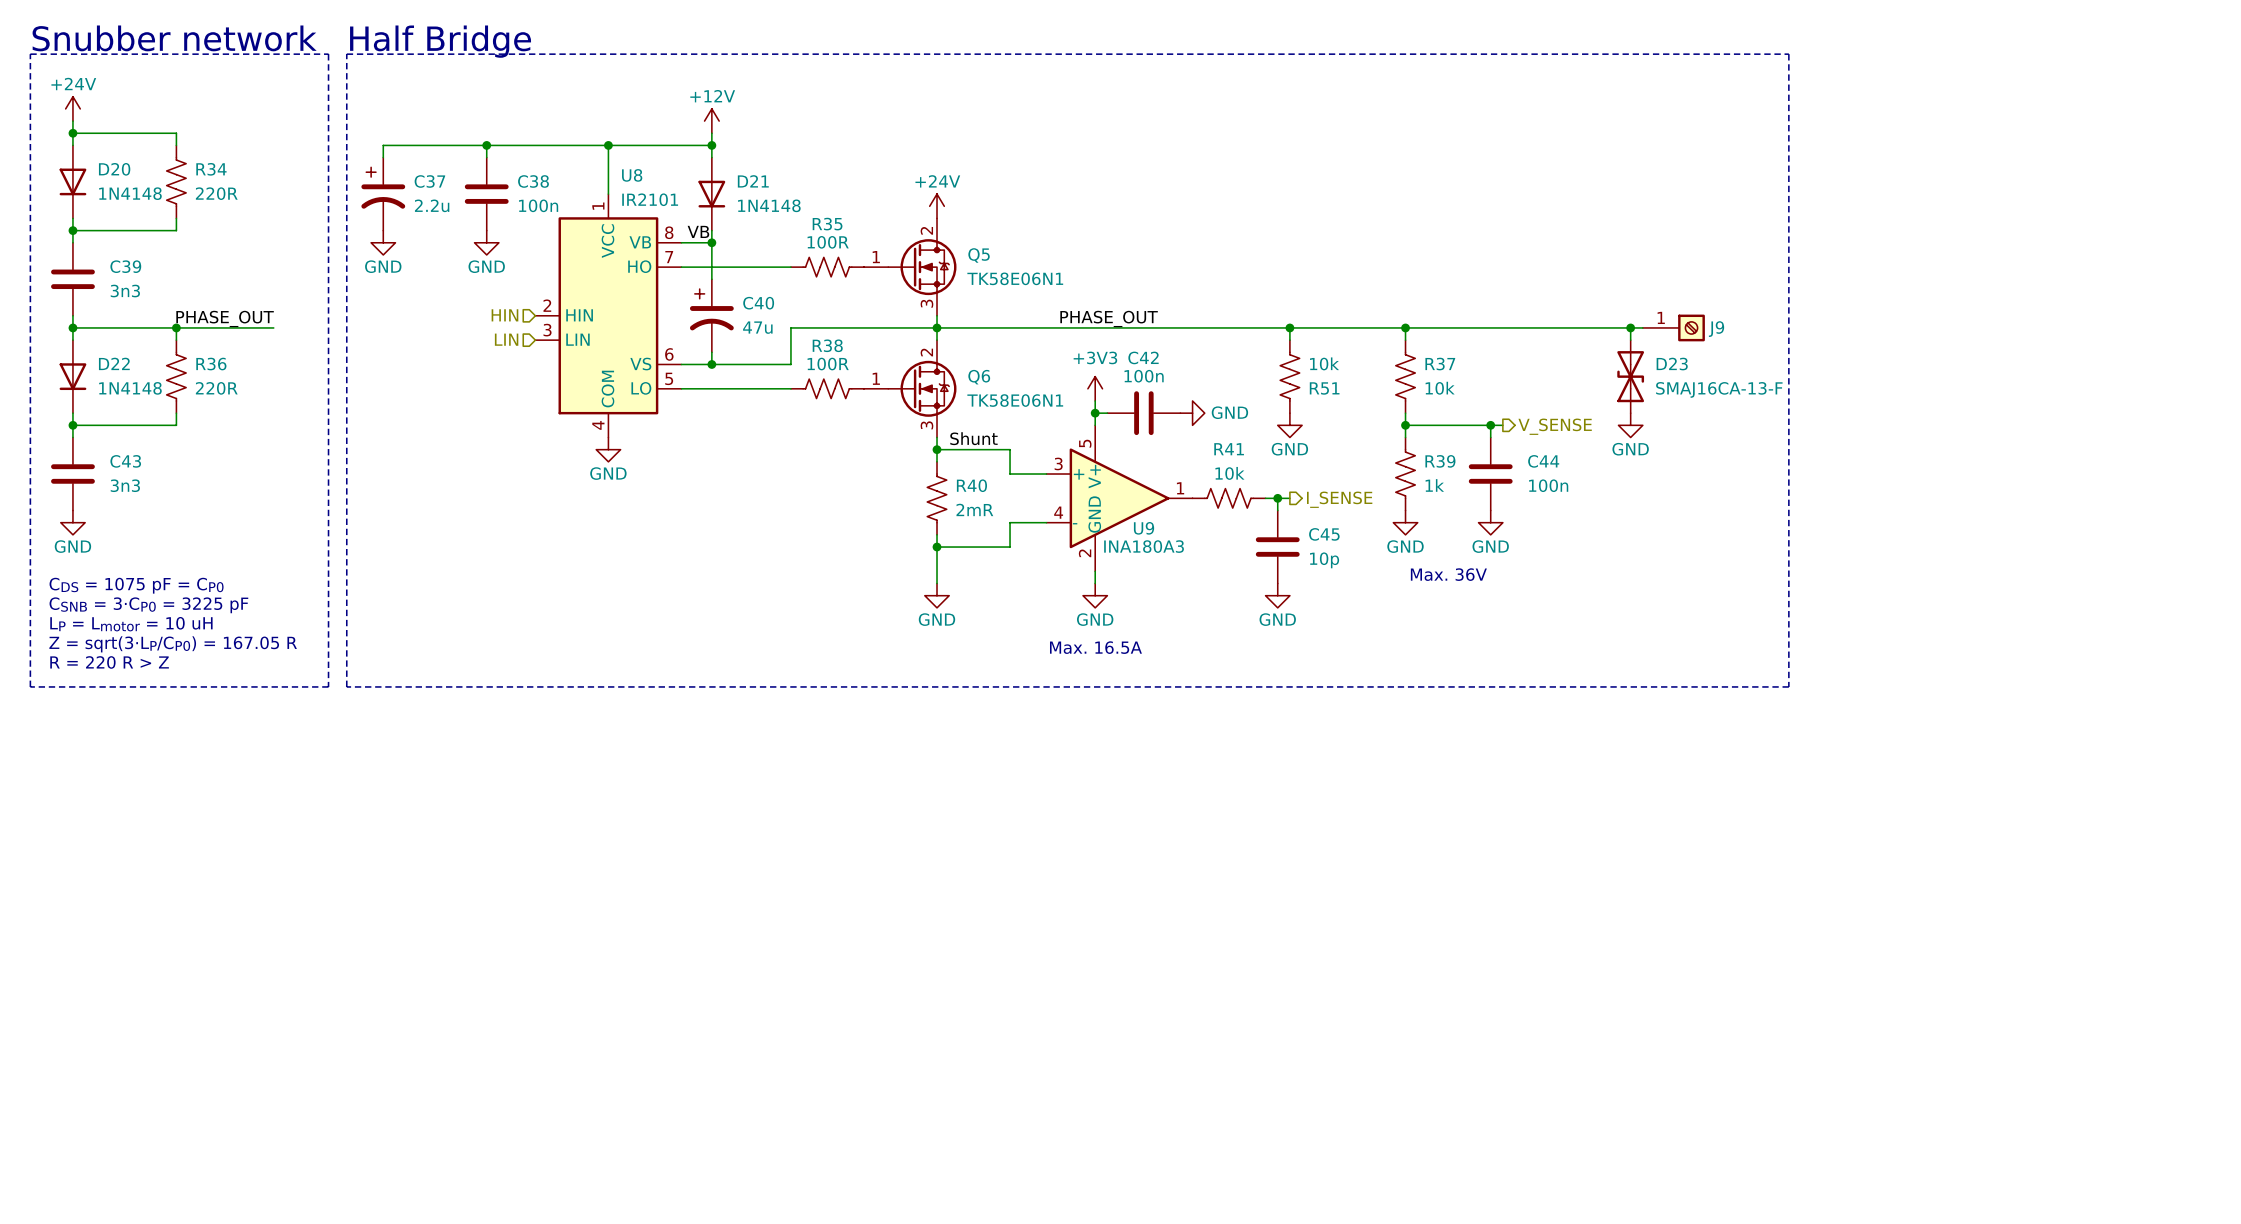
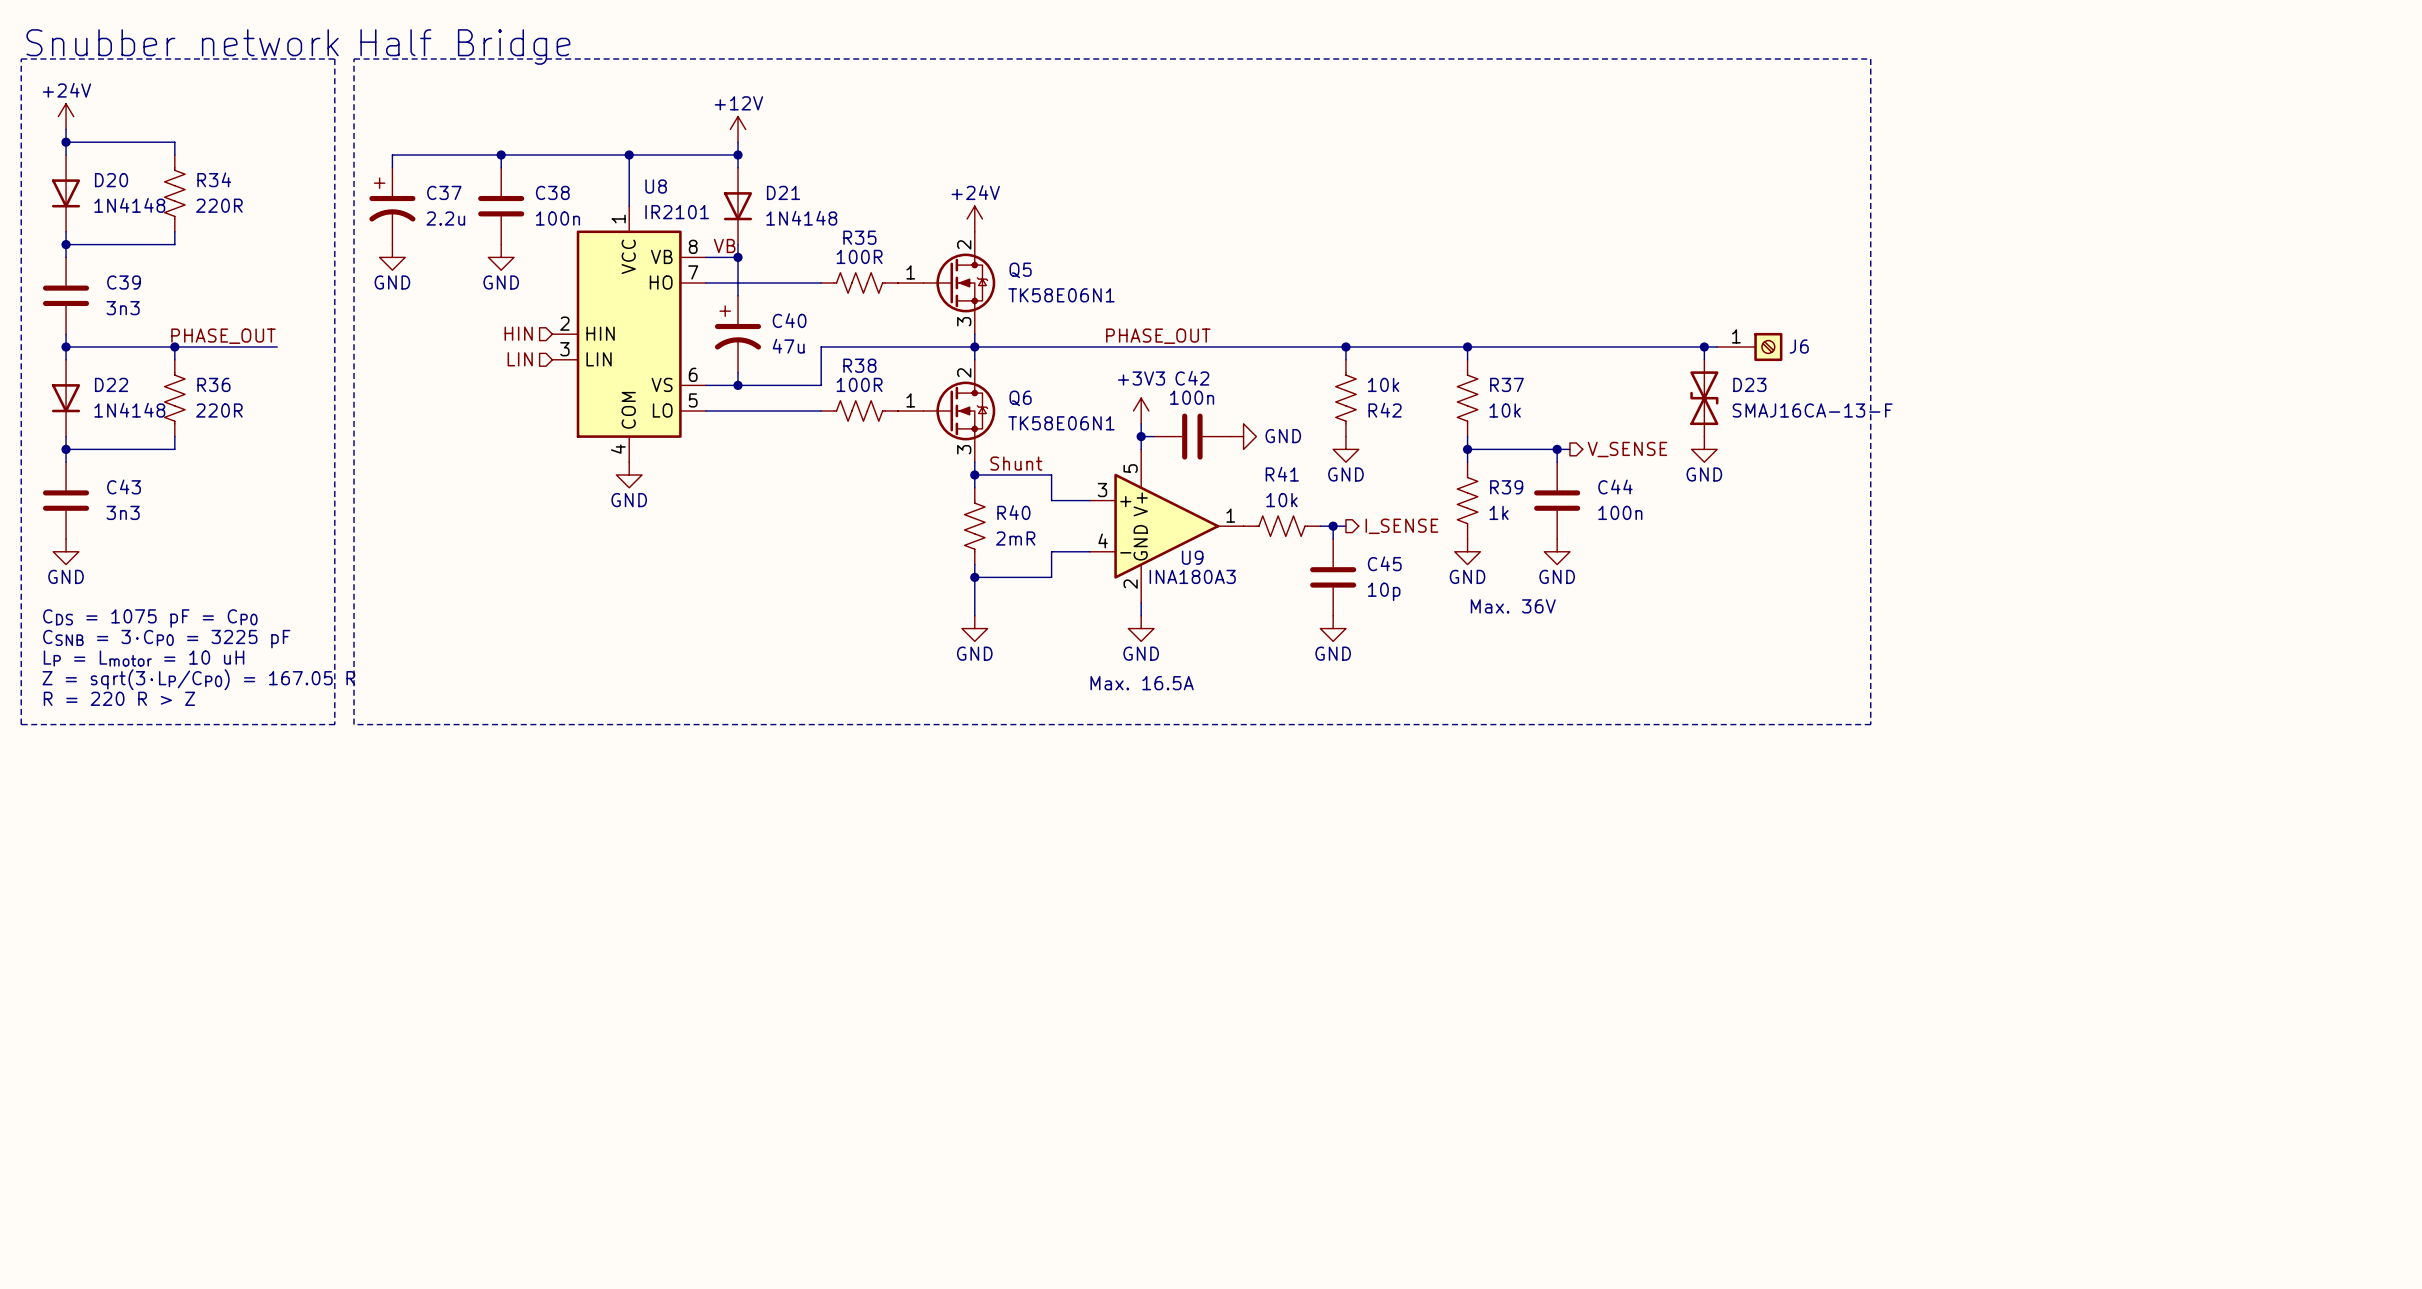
J9 name: J9 (1716, 329) -> J6 (1799, 346)
R51 name: R51 (1324, 388) -> R42 (1385, 410)

